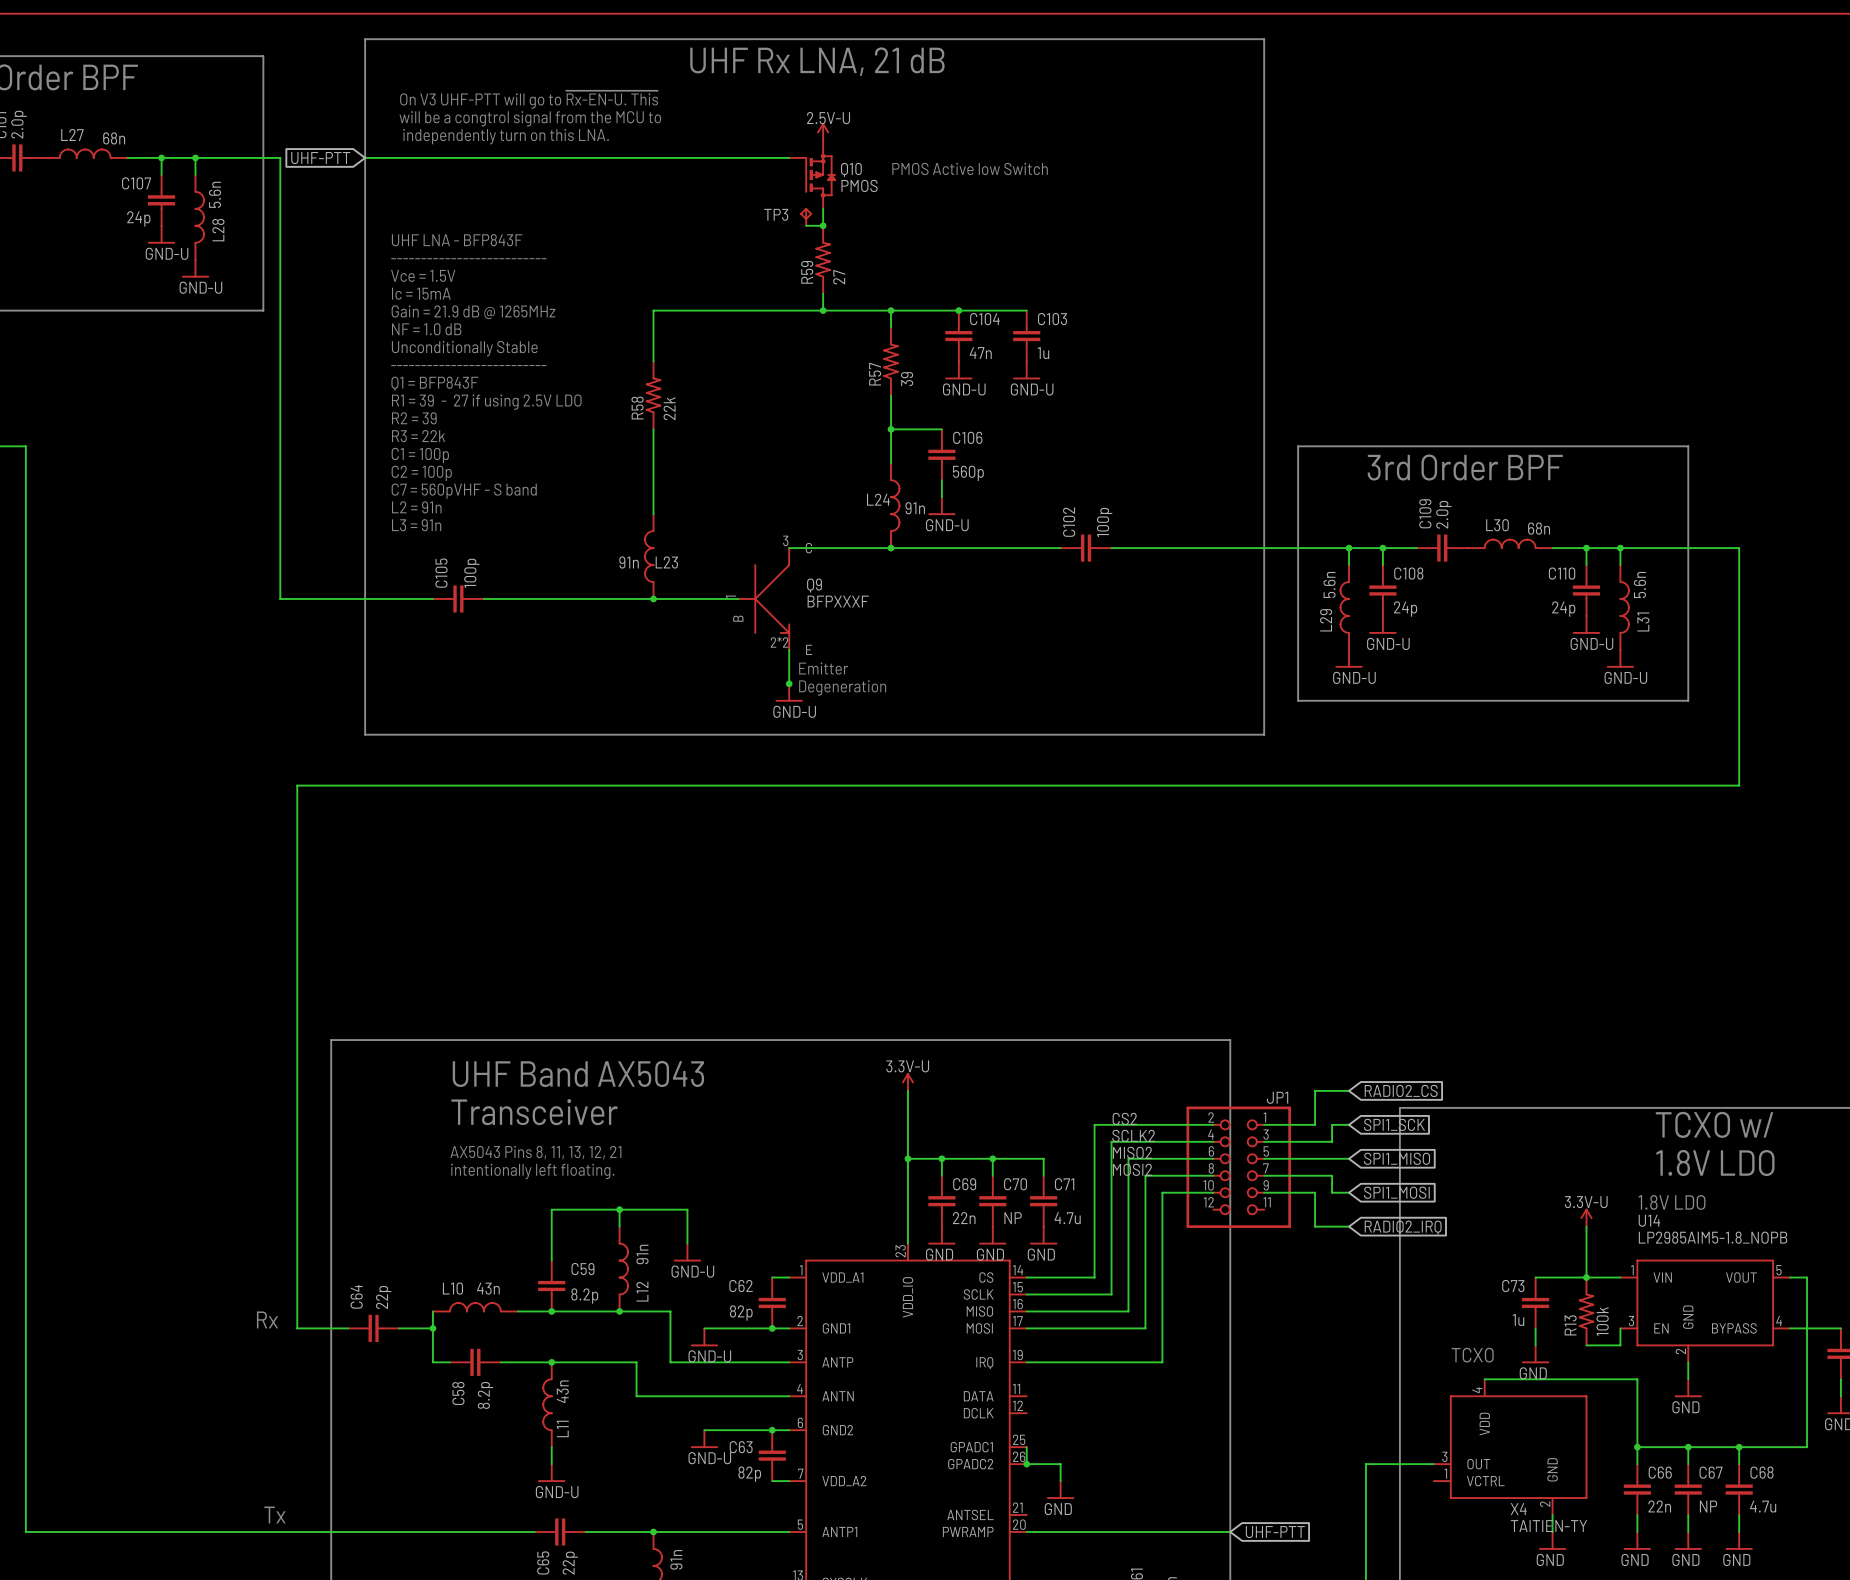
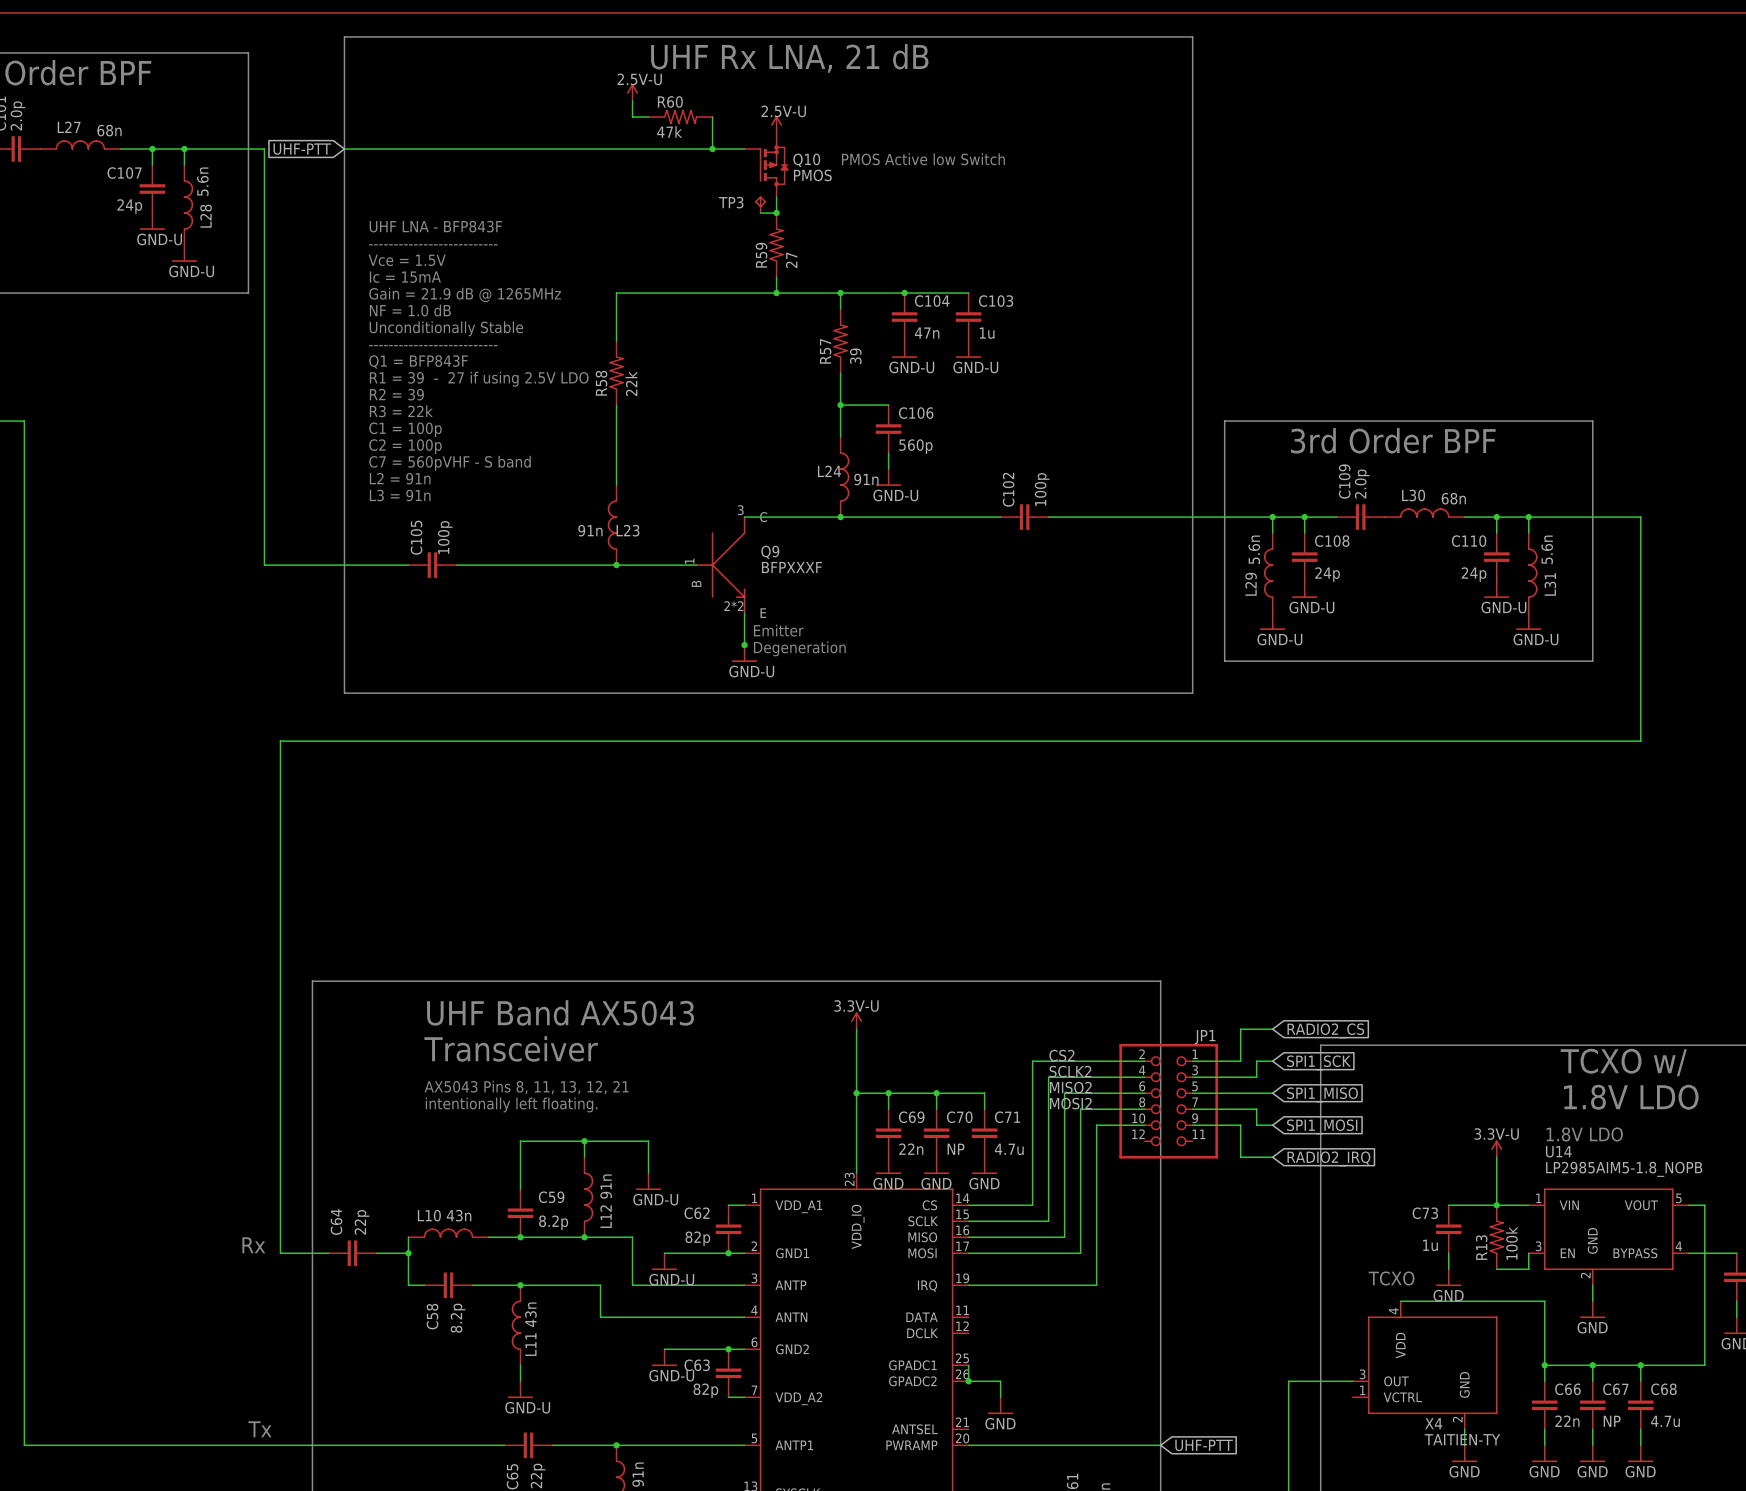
power symbol: none -> 2.5V-U (632, 92)
text: On V3 UHF-PTT will go to ~{Rx-EN-U. This} (529, 99) -> none
wire: none -> (632, 100) (632, 117) (648, 117)
text: will be a congtrol signal from the MCU to (530, 118) -> none
R60: none -> 47k (680, 117)
wire: none -> (712, 117) (712, 149)
text: independently turn on this LNA. (506, 136) -> none
junction: none -> (712, 149)

